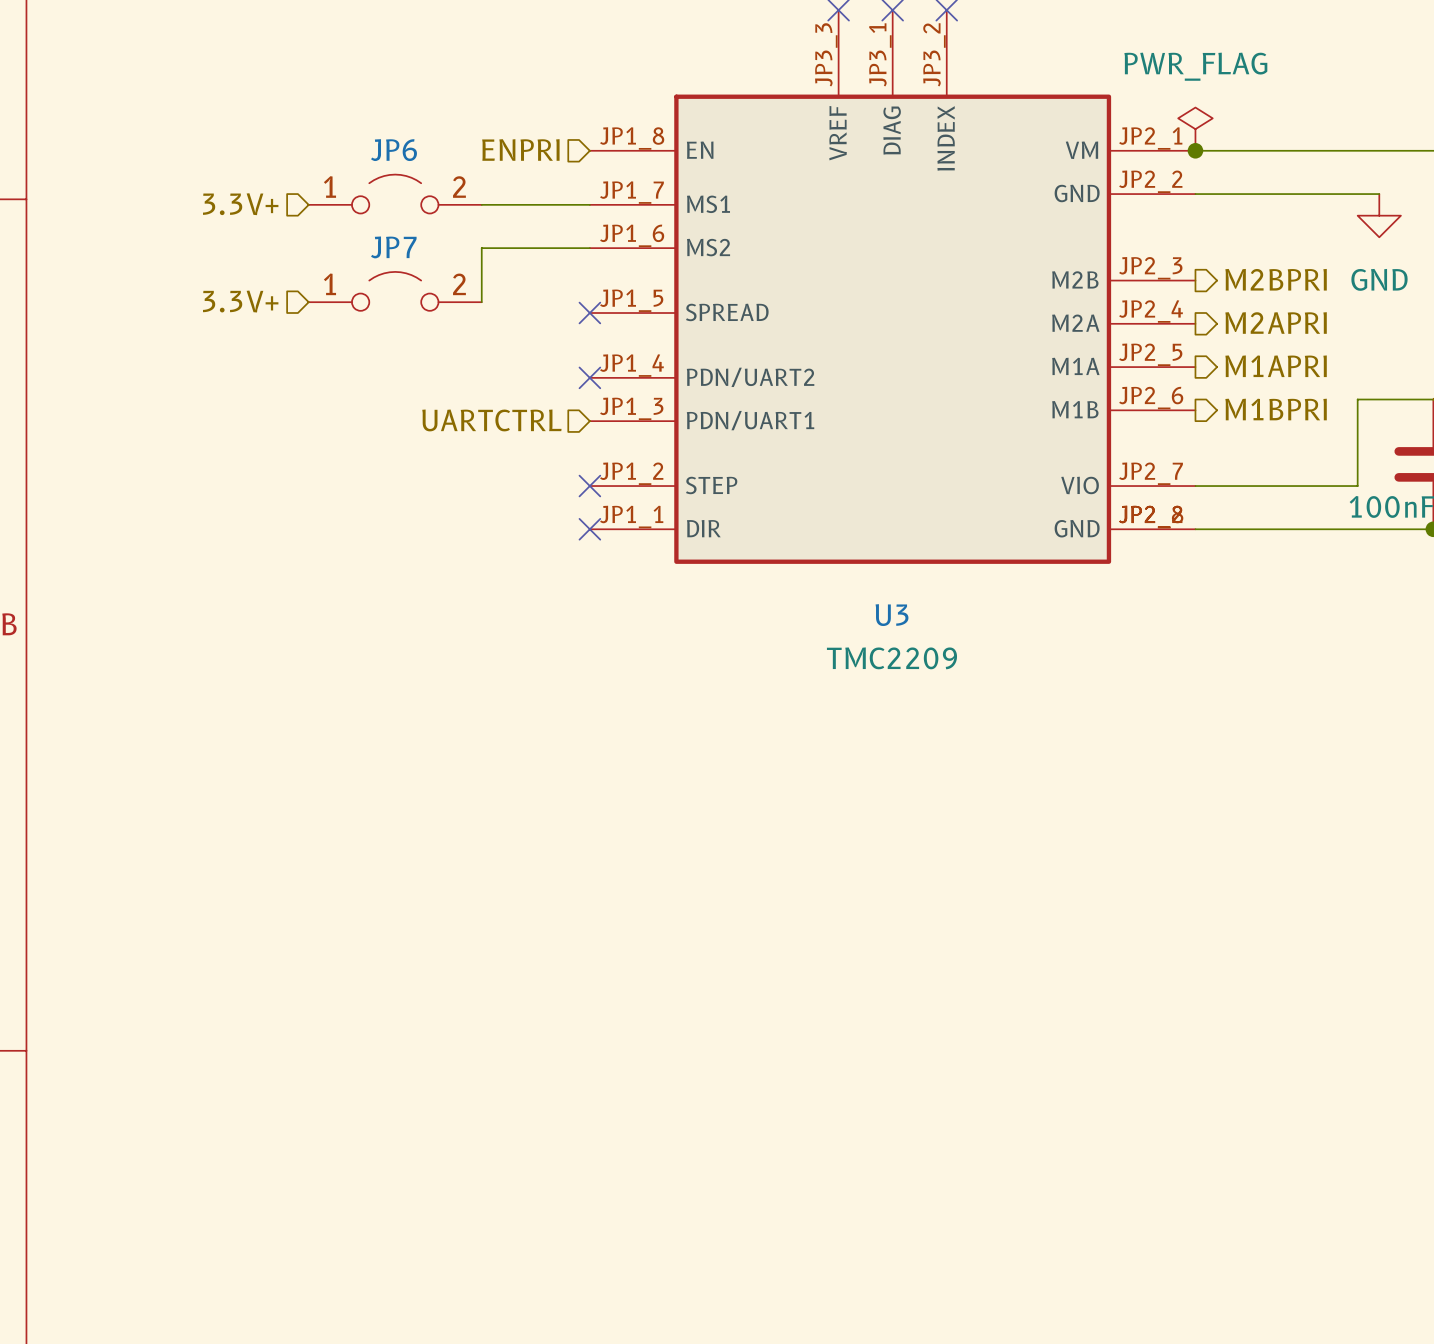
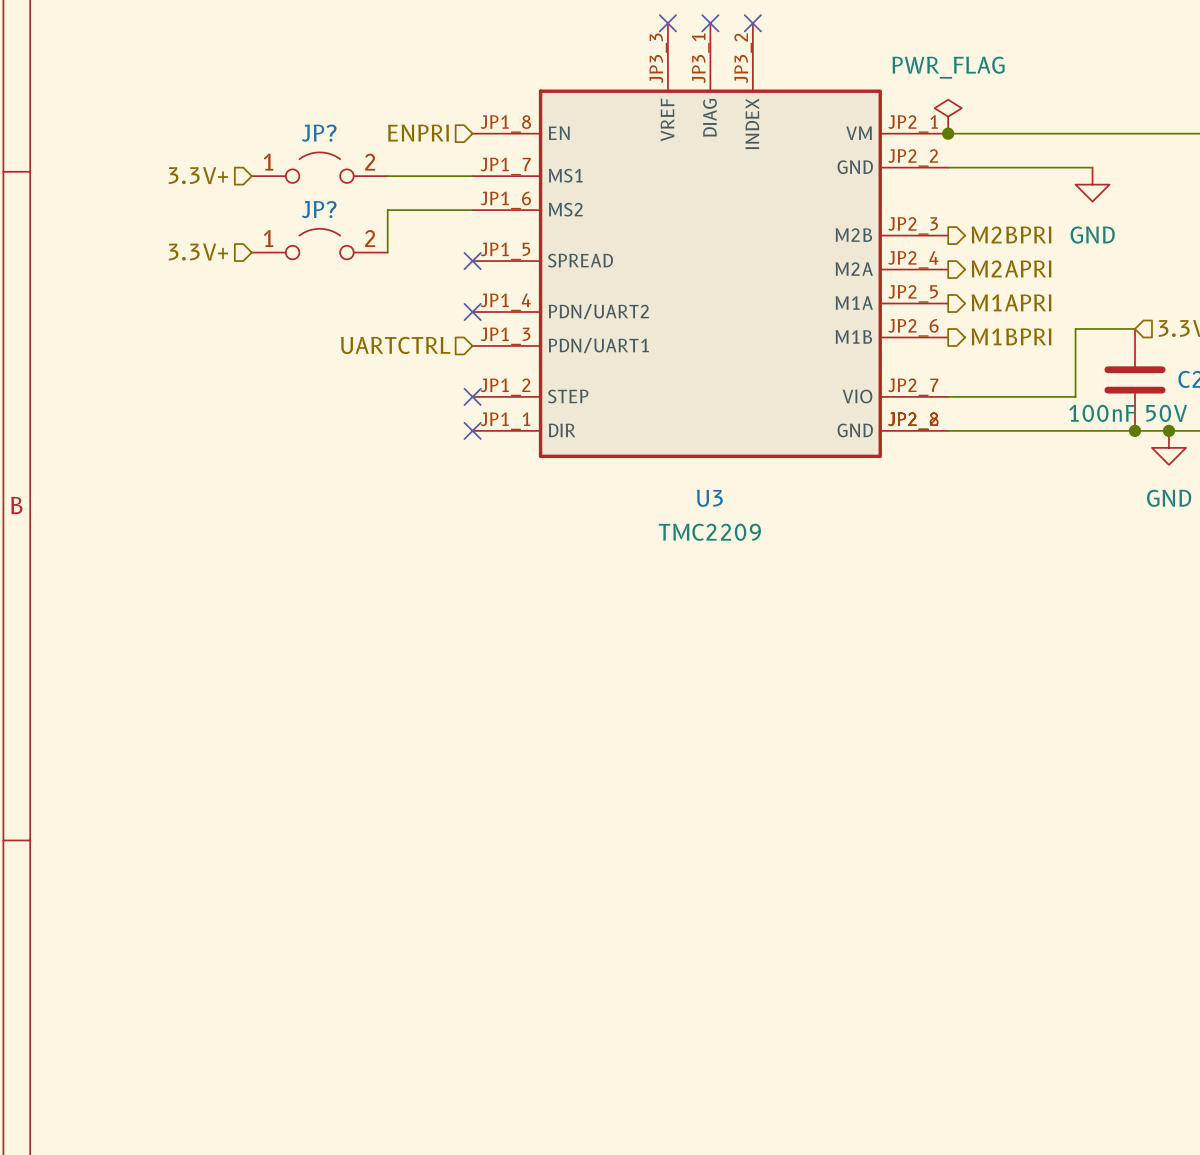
JP6 name: JP6 (394, 150) -> JP? (319, 133)
JP7 name: JP7 (393, 247) -> JP? (319, 209)

